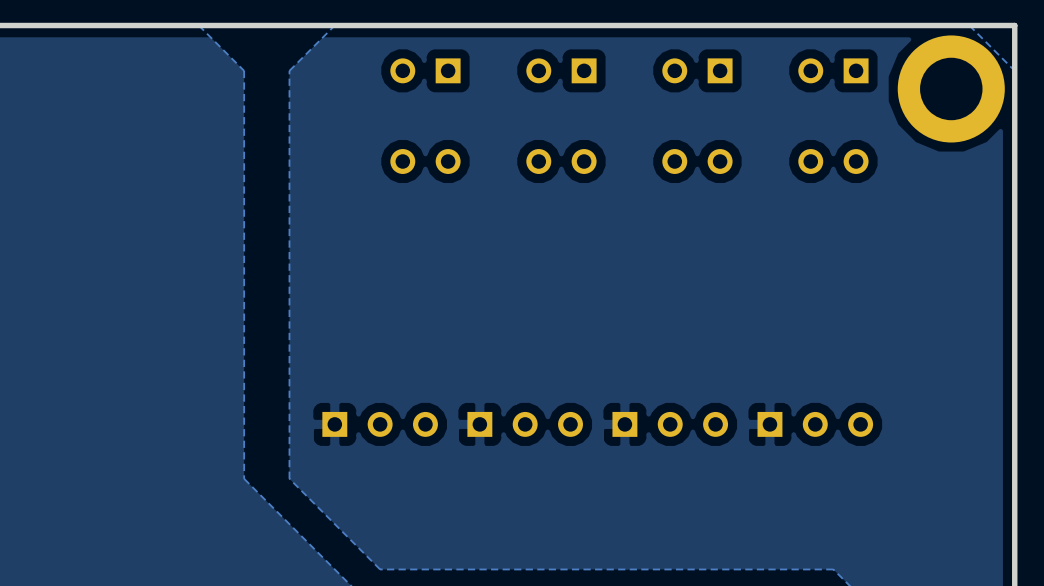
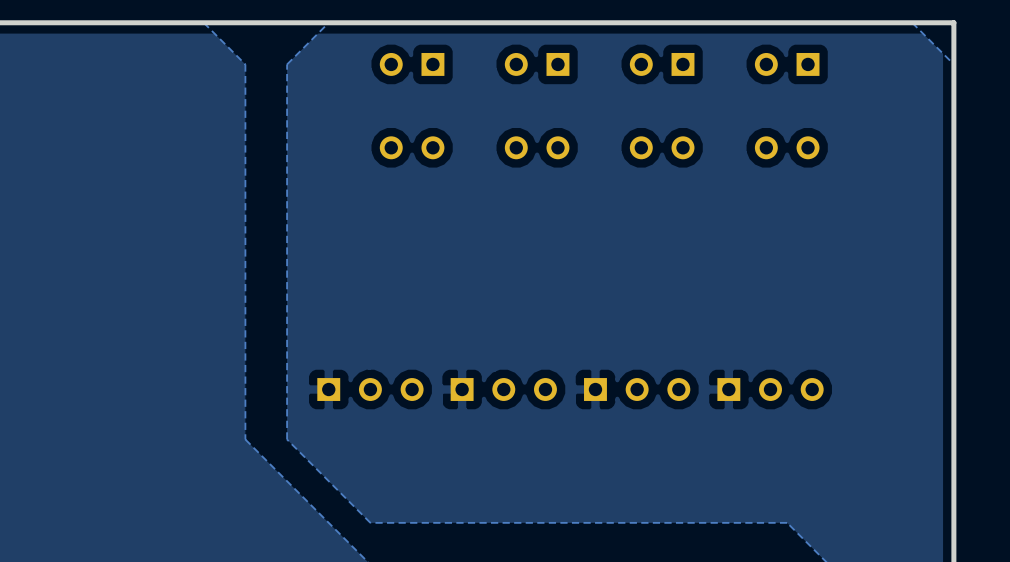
part: (951, 88) -> none

